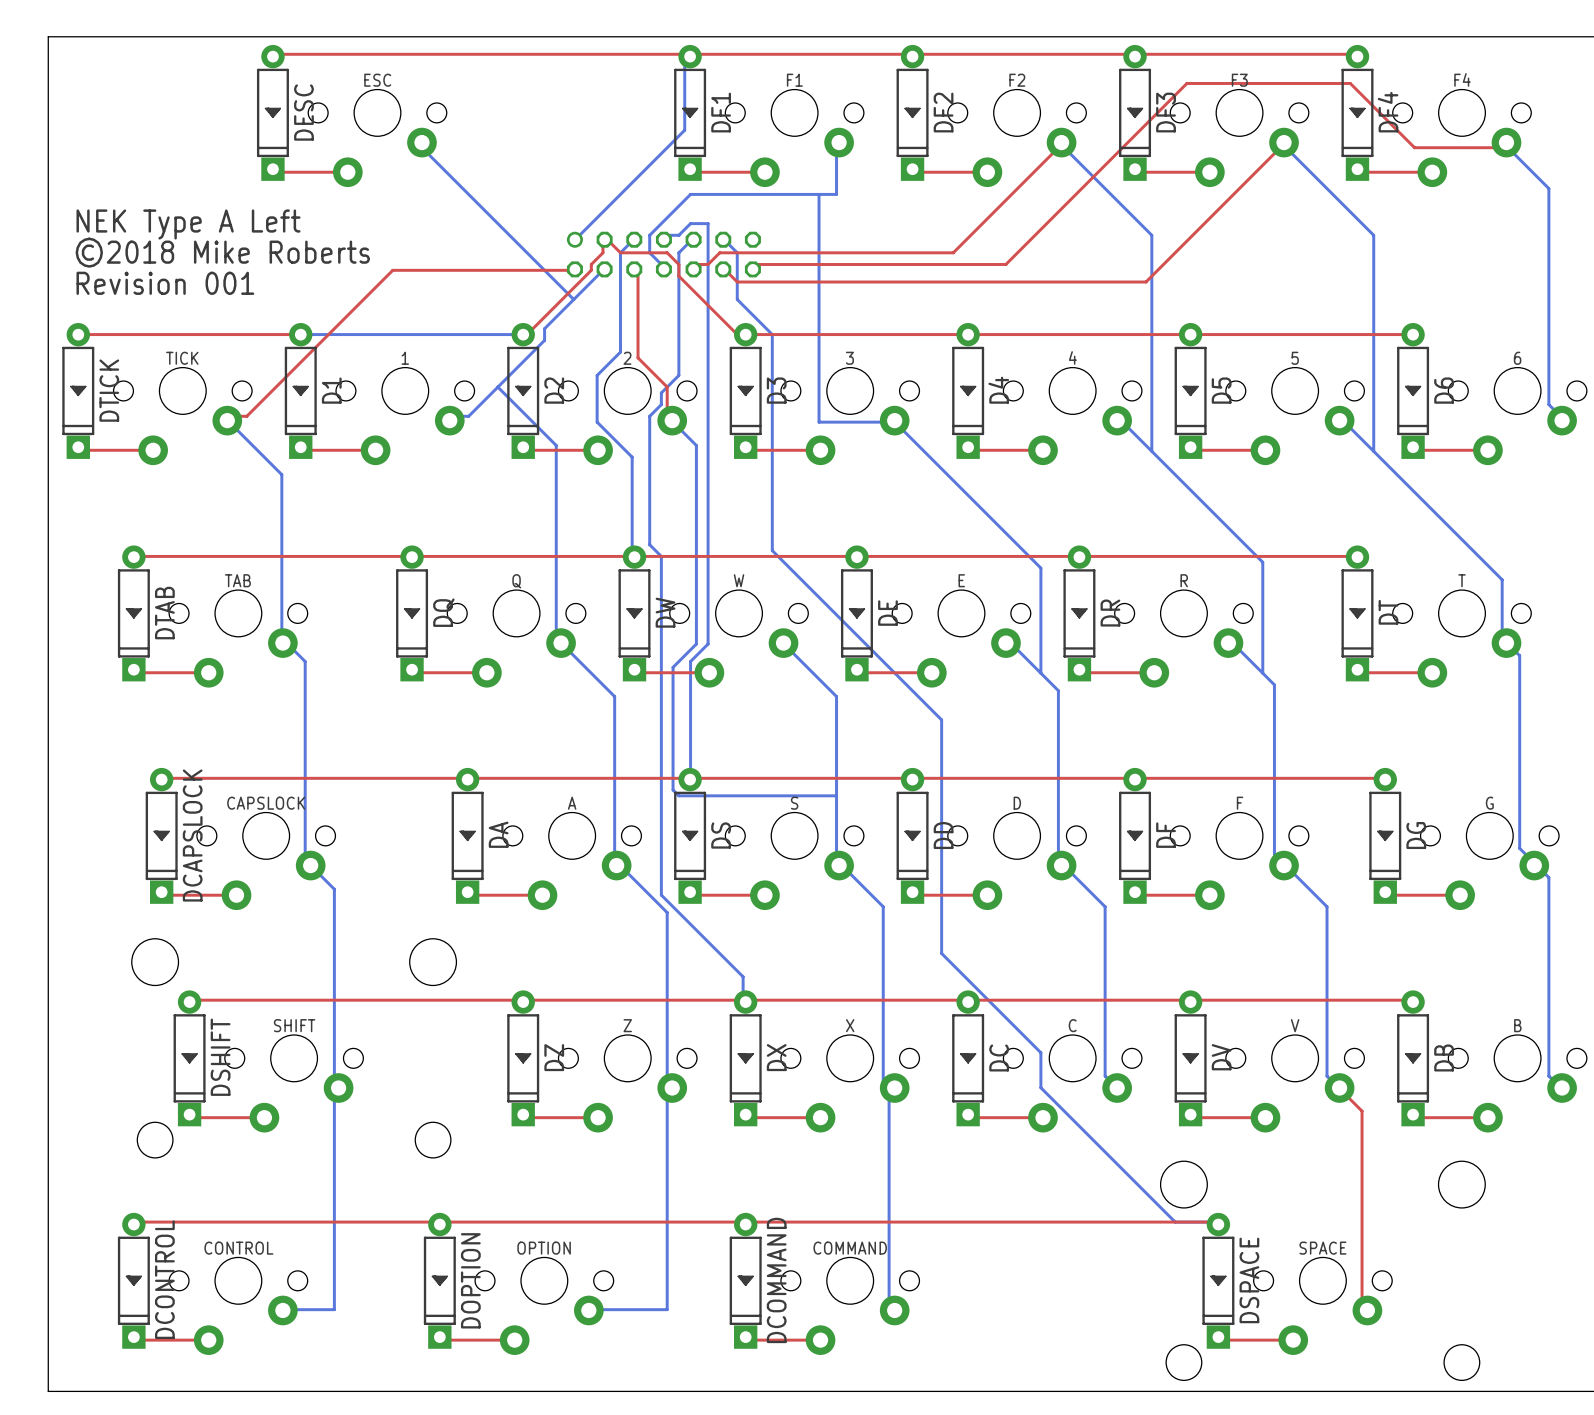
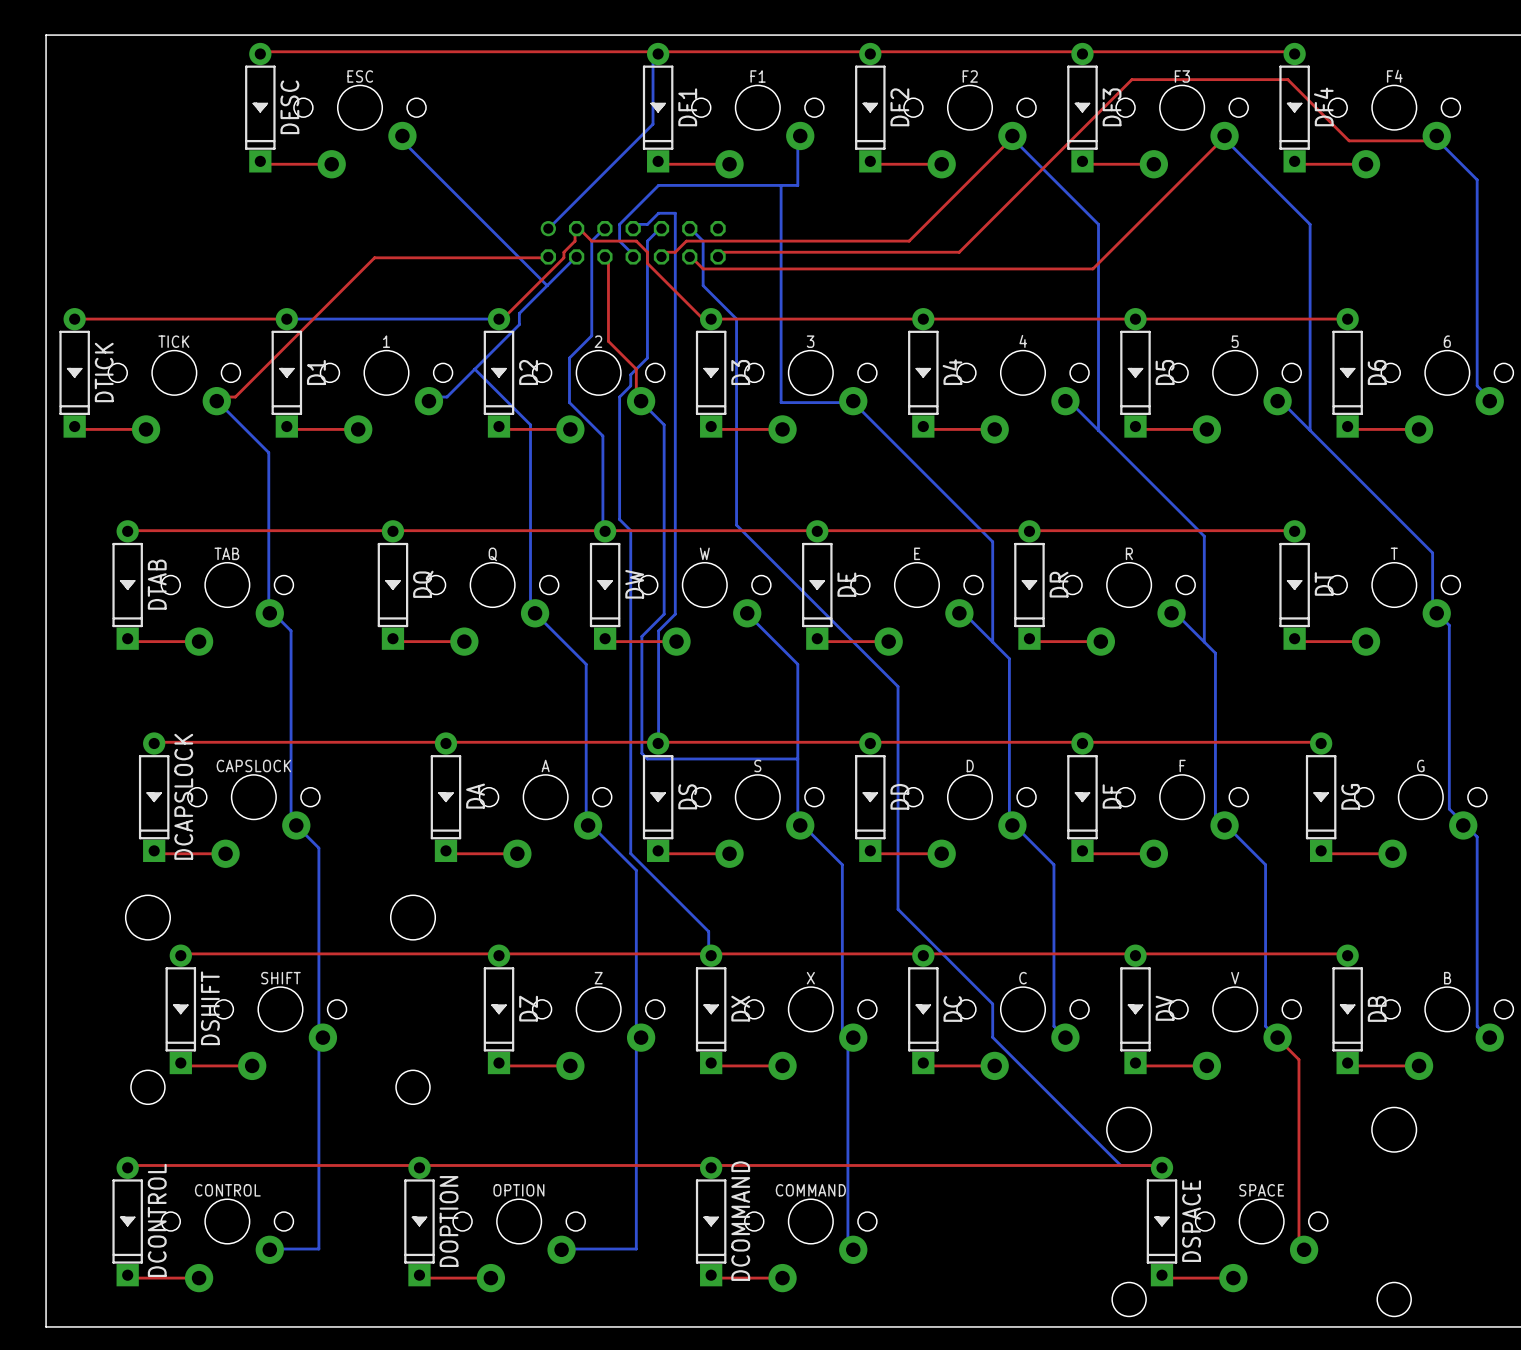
text: NEK Type A Left (188, 224) -> none
text: ©2018 Mike Roberts (222, 252) -> none
text: Revision 001 (165, 283) -> none

